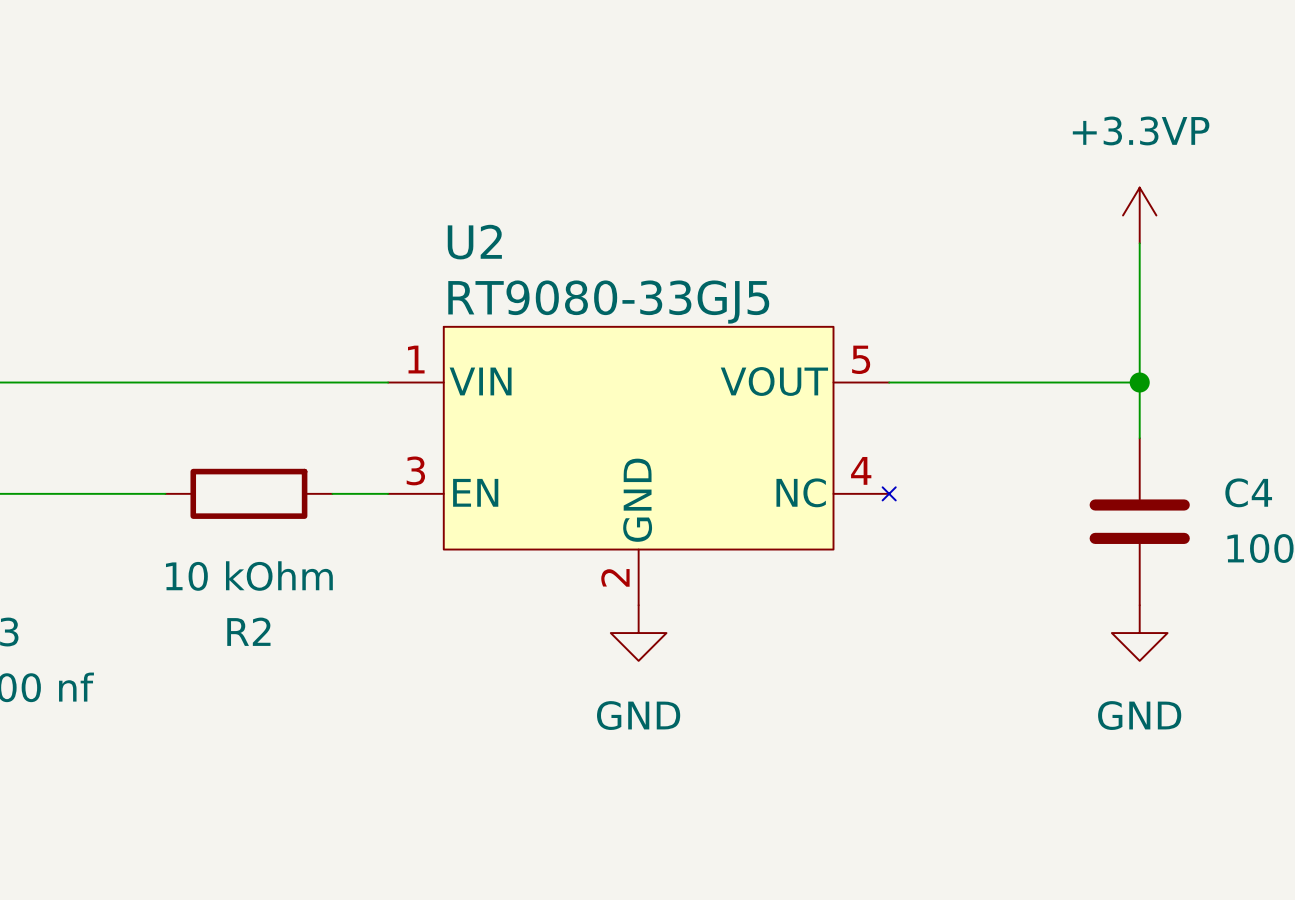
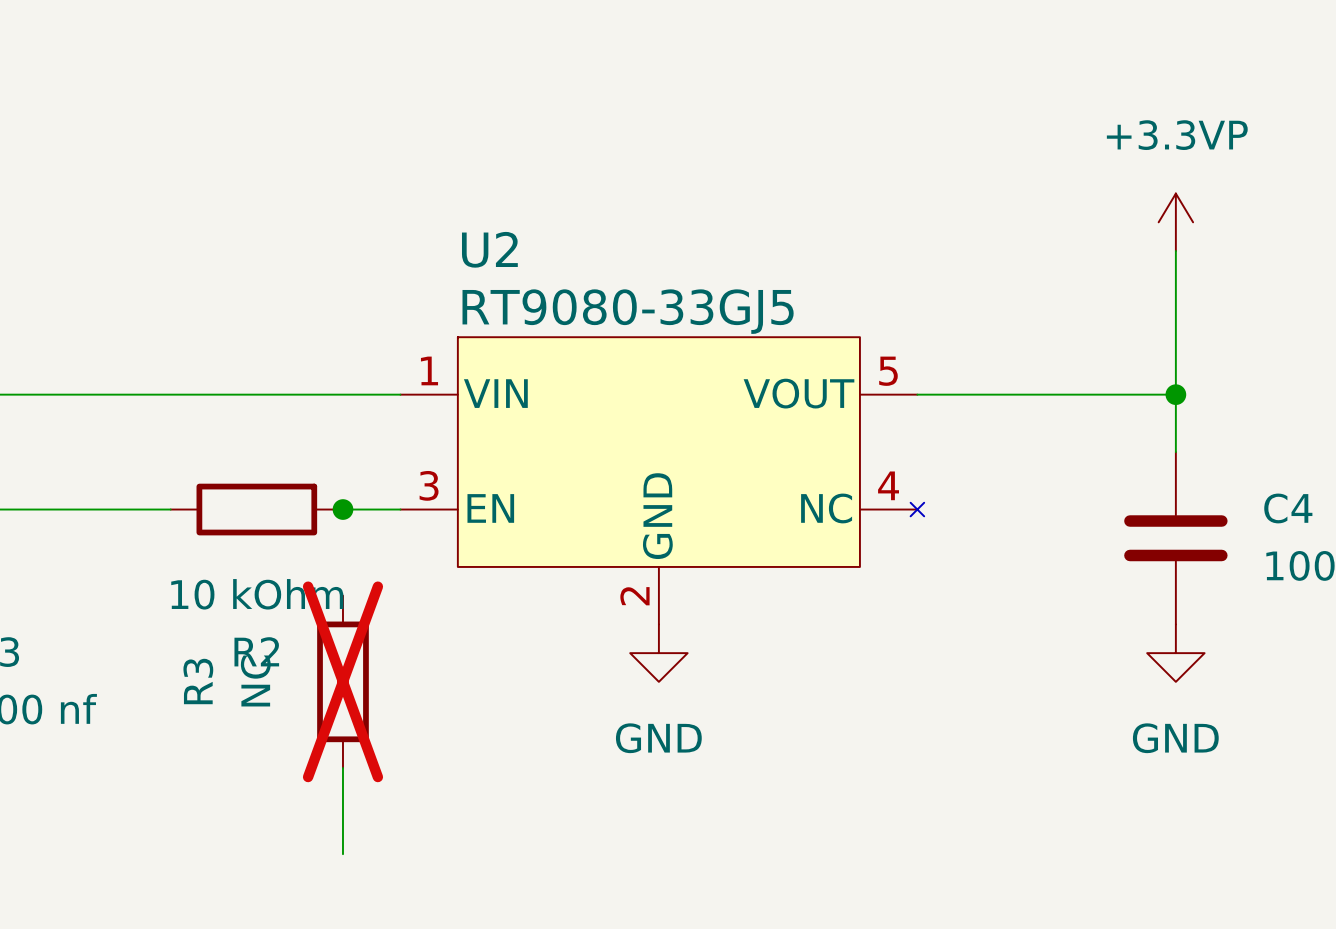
junction: none -> (342, 509)
R3: none -> NC (342, 681)
wire: none -> (342, 768) (342, 854)

